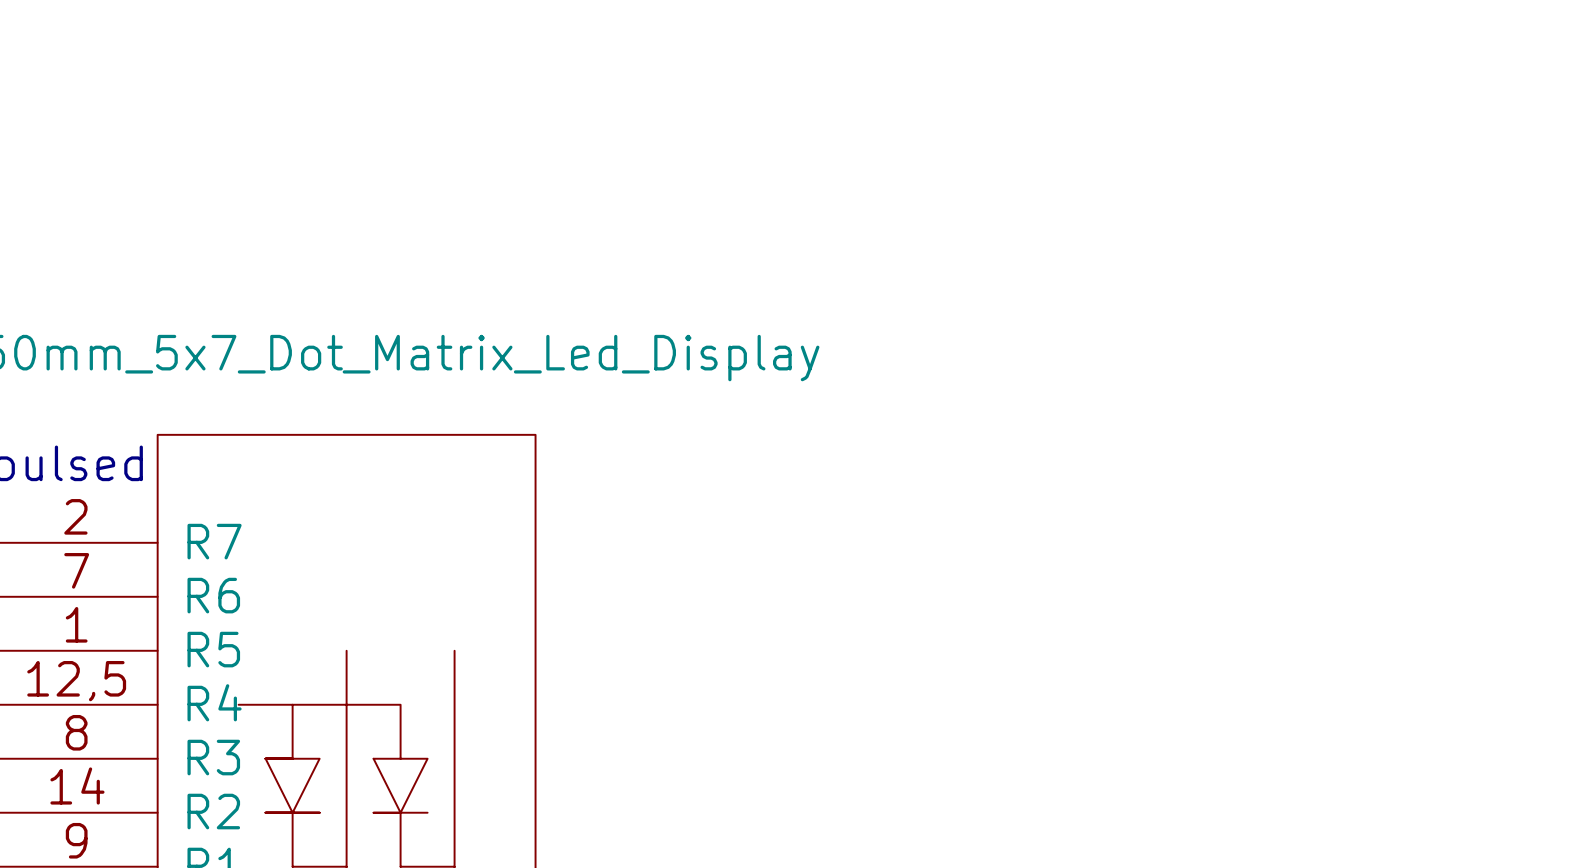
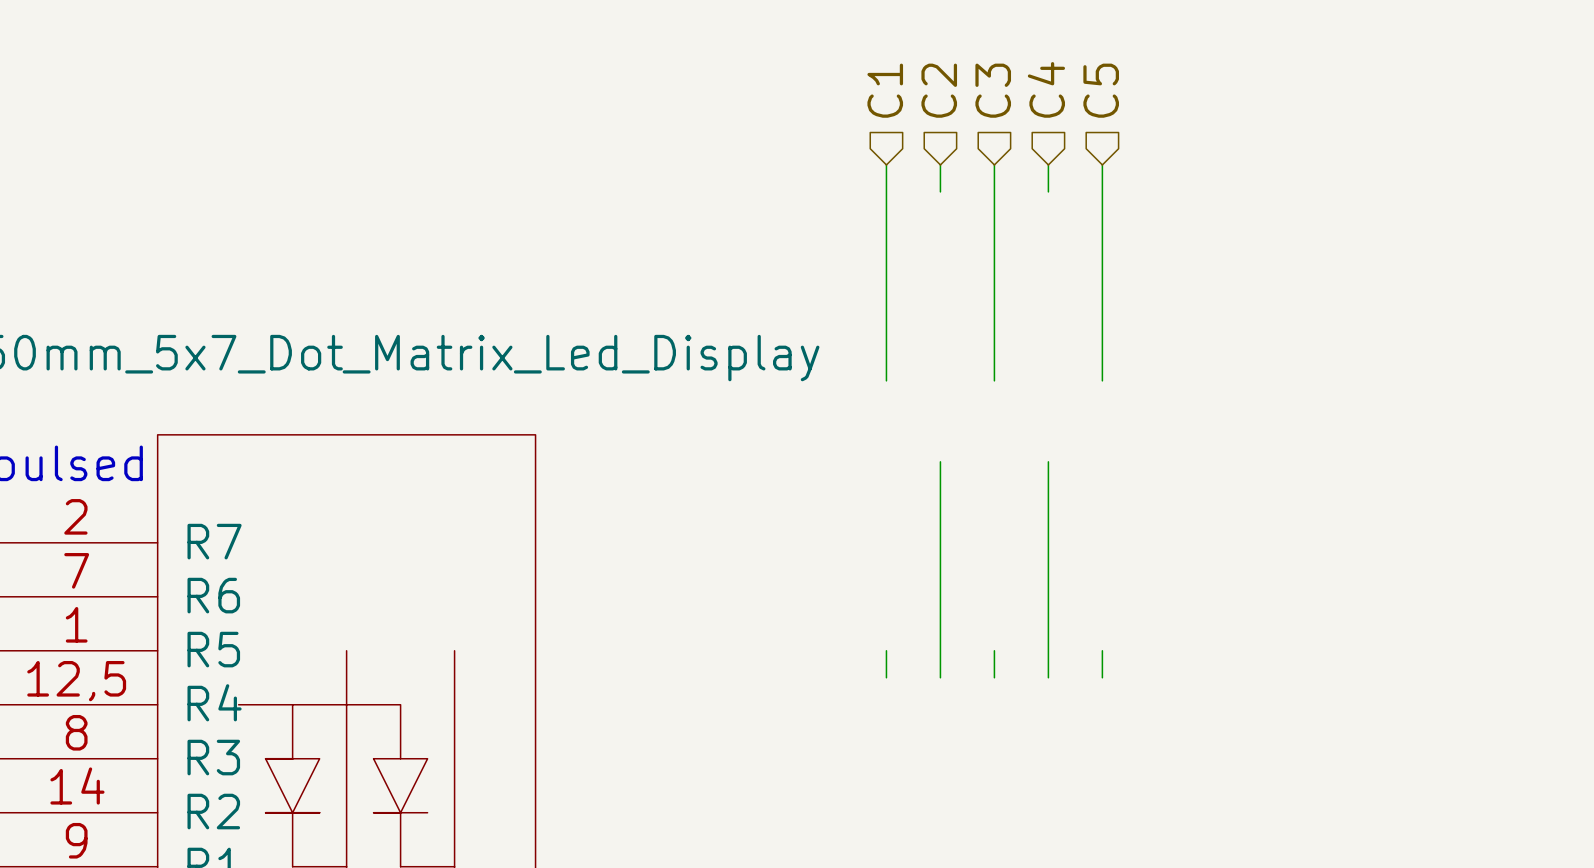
hierarchical label: none -> C4 (1046, 89)
hierarchical label: none -> C1 (885, 90)
hierarchical label: none -> C2 (939, 90)
hierarchical label: none -> C3 (993, 90)
hierarchical label: none -> C5 (1101, 90)
wire: none -> (886, 164) (886, 380)
wire: none -> (940, 164) (940, 191)
wire: none -> (994, 164) (994, 380)
wire: none -> (1048, 164) (1048, 191)
wire: none -> (1102, 164) (1102, 380)
wire: none -> (940, 461) (940, 677)
wire: none -> (1048, 461) (1048, 677)
wire: none -> (886, 650) (886, 677)
wire: none -> (994, 650) (994, 677)
wire: none -> (1102, 650) (1102, 677)

